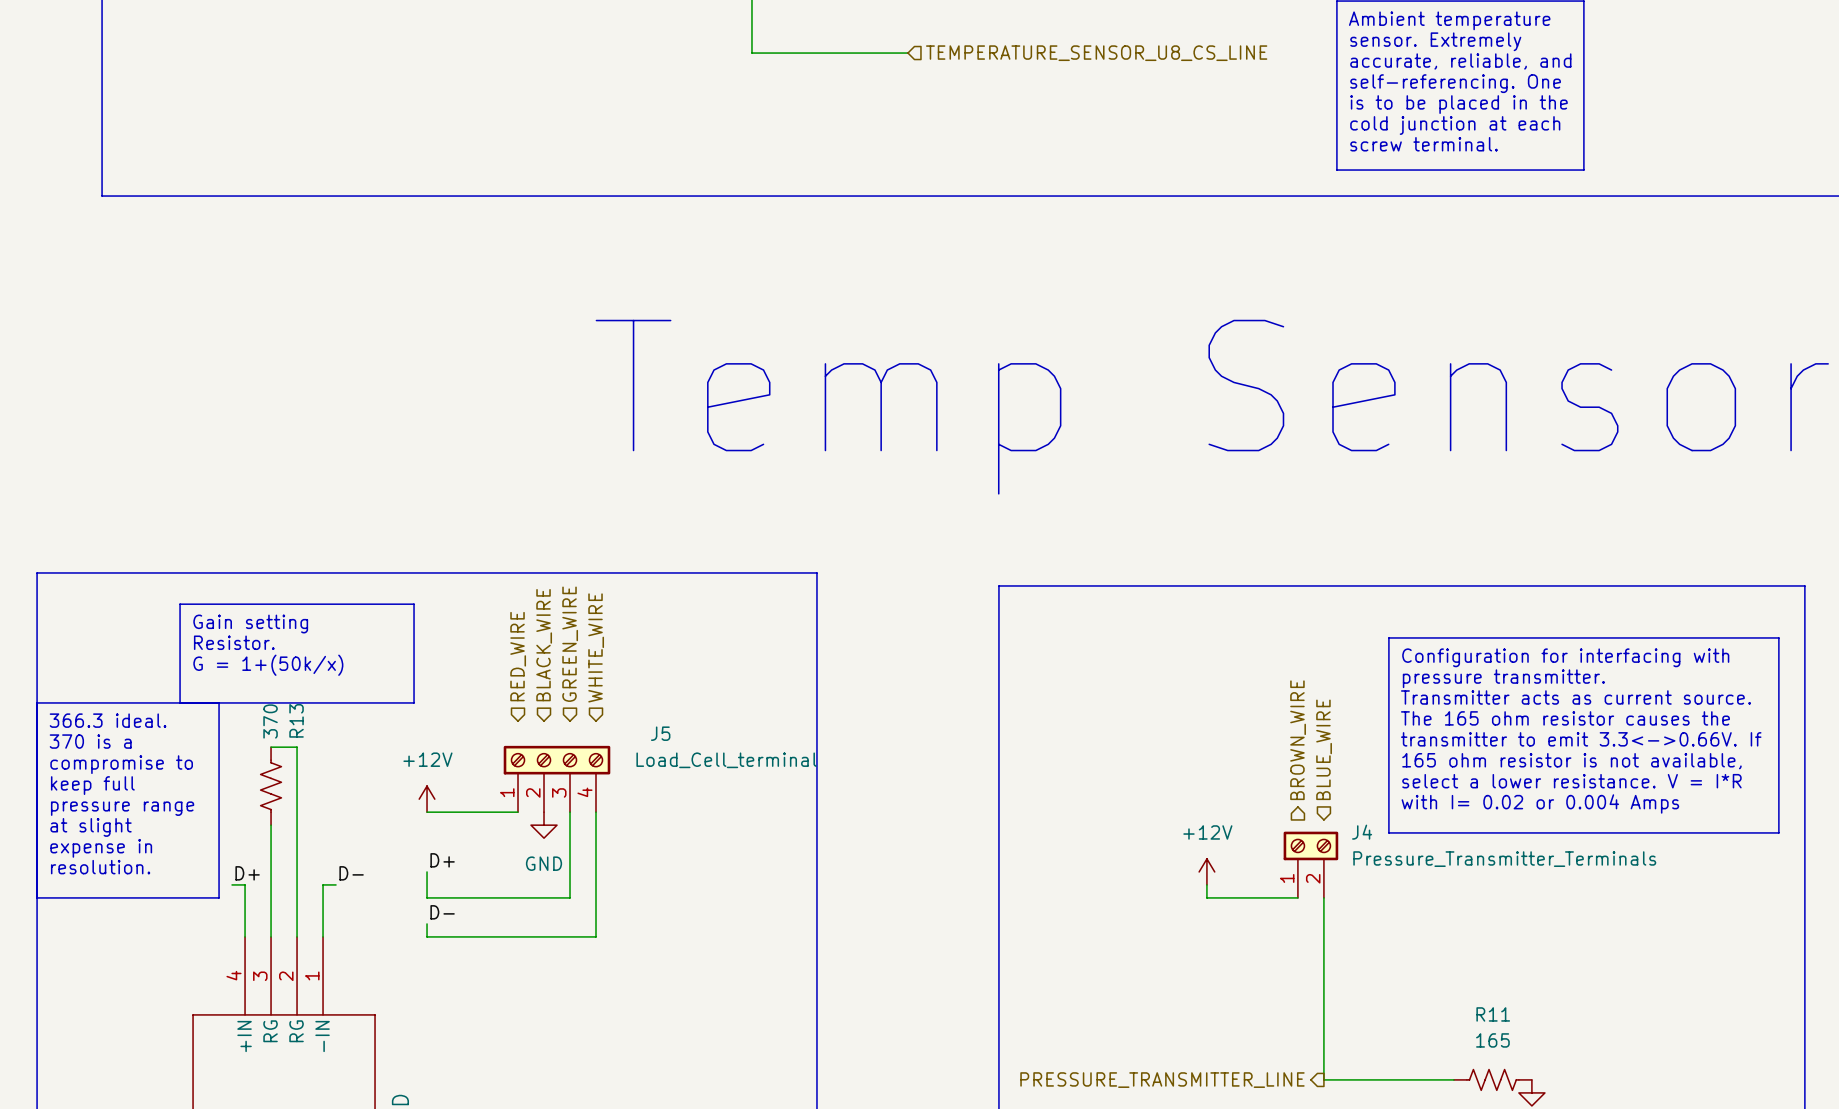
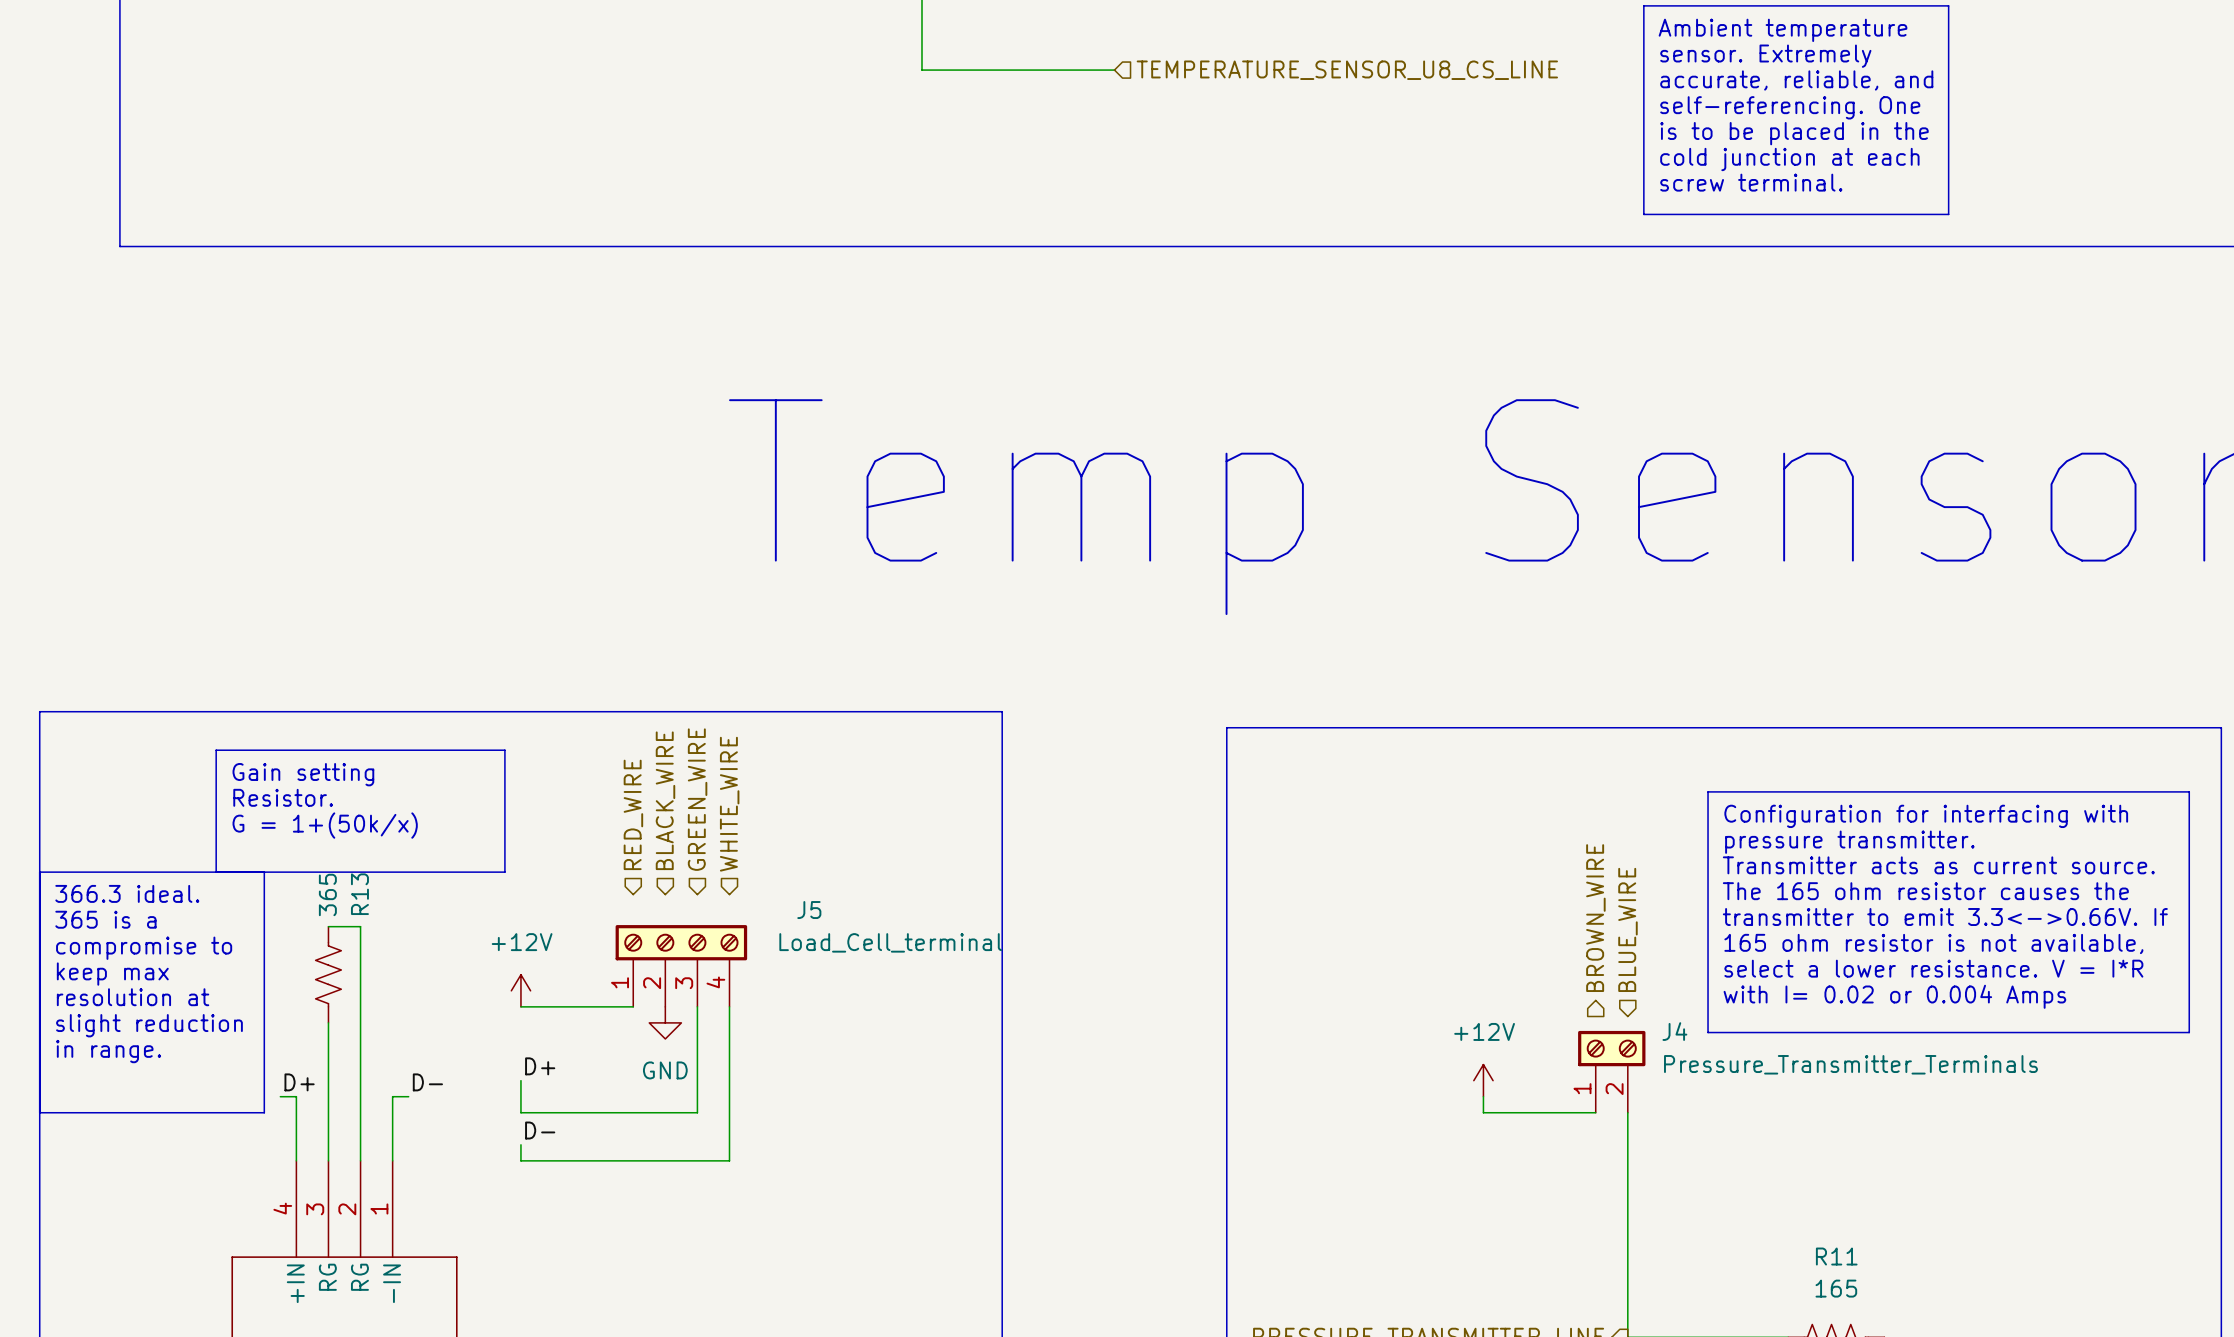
R13 value: 370 (270, 721) -> 365 (327, 894)
text: 370 is a (90, 741) -> 365 is a (105, 919)
text: keep full (92, 785) -> keep max (112, 974)
text: pressure range (122, 808) -> resolution at (133, 997)
text: at slight (91, 827) -> slight reduction (149, 1025)
text: expense in (101, 848) -> in range. (108, 1051)
text: resolution. (100, 867) -> none

